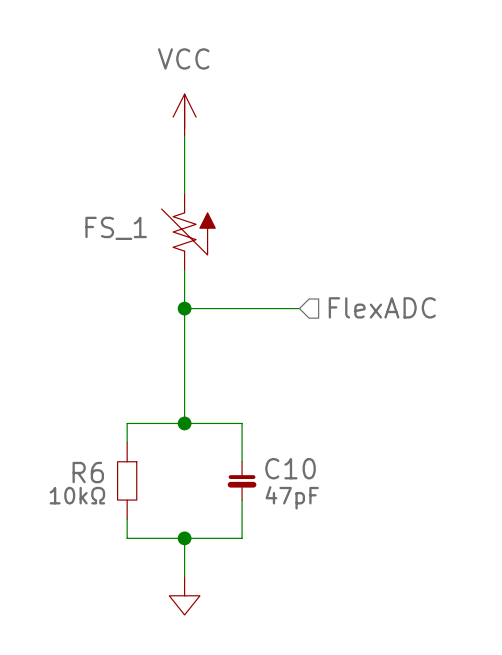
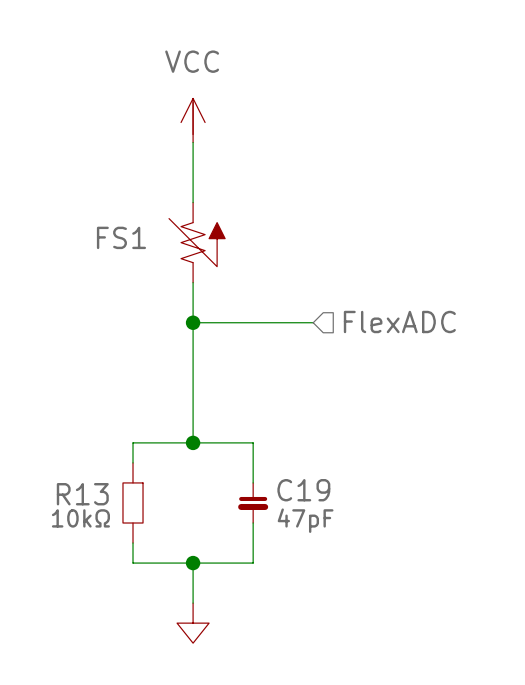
FS_1 name: FS_1 (116, 228) -> FS1 (121, 237)
C10 name: C10 (290, 468) -> C19 (303, 490)
R6 name: R6 (88, 472) -> R13 (82, 494)

